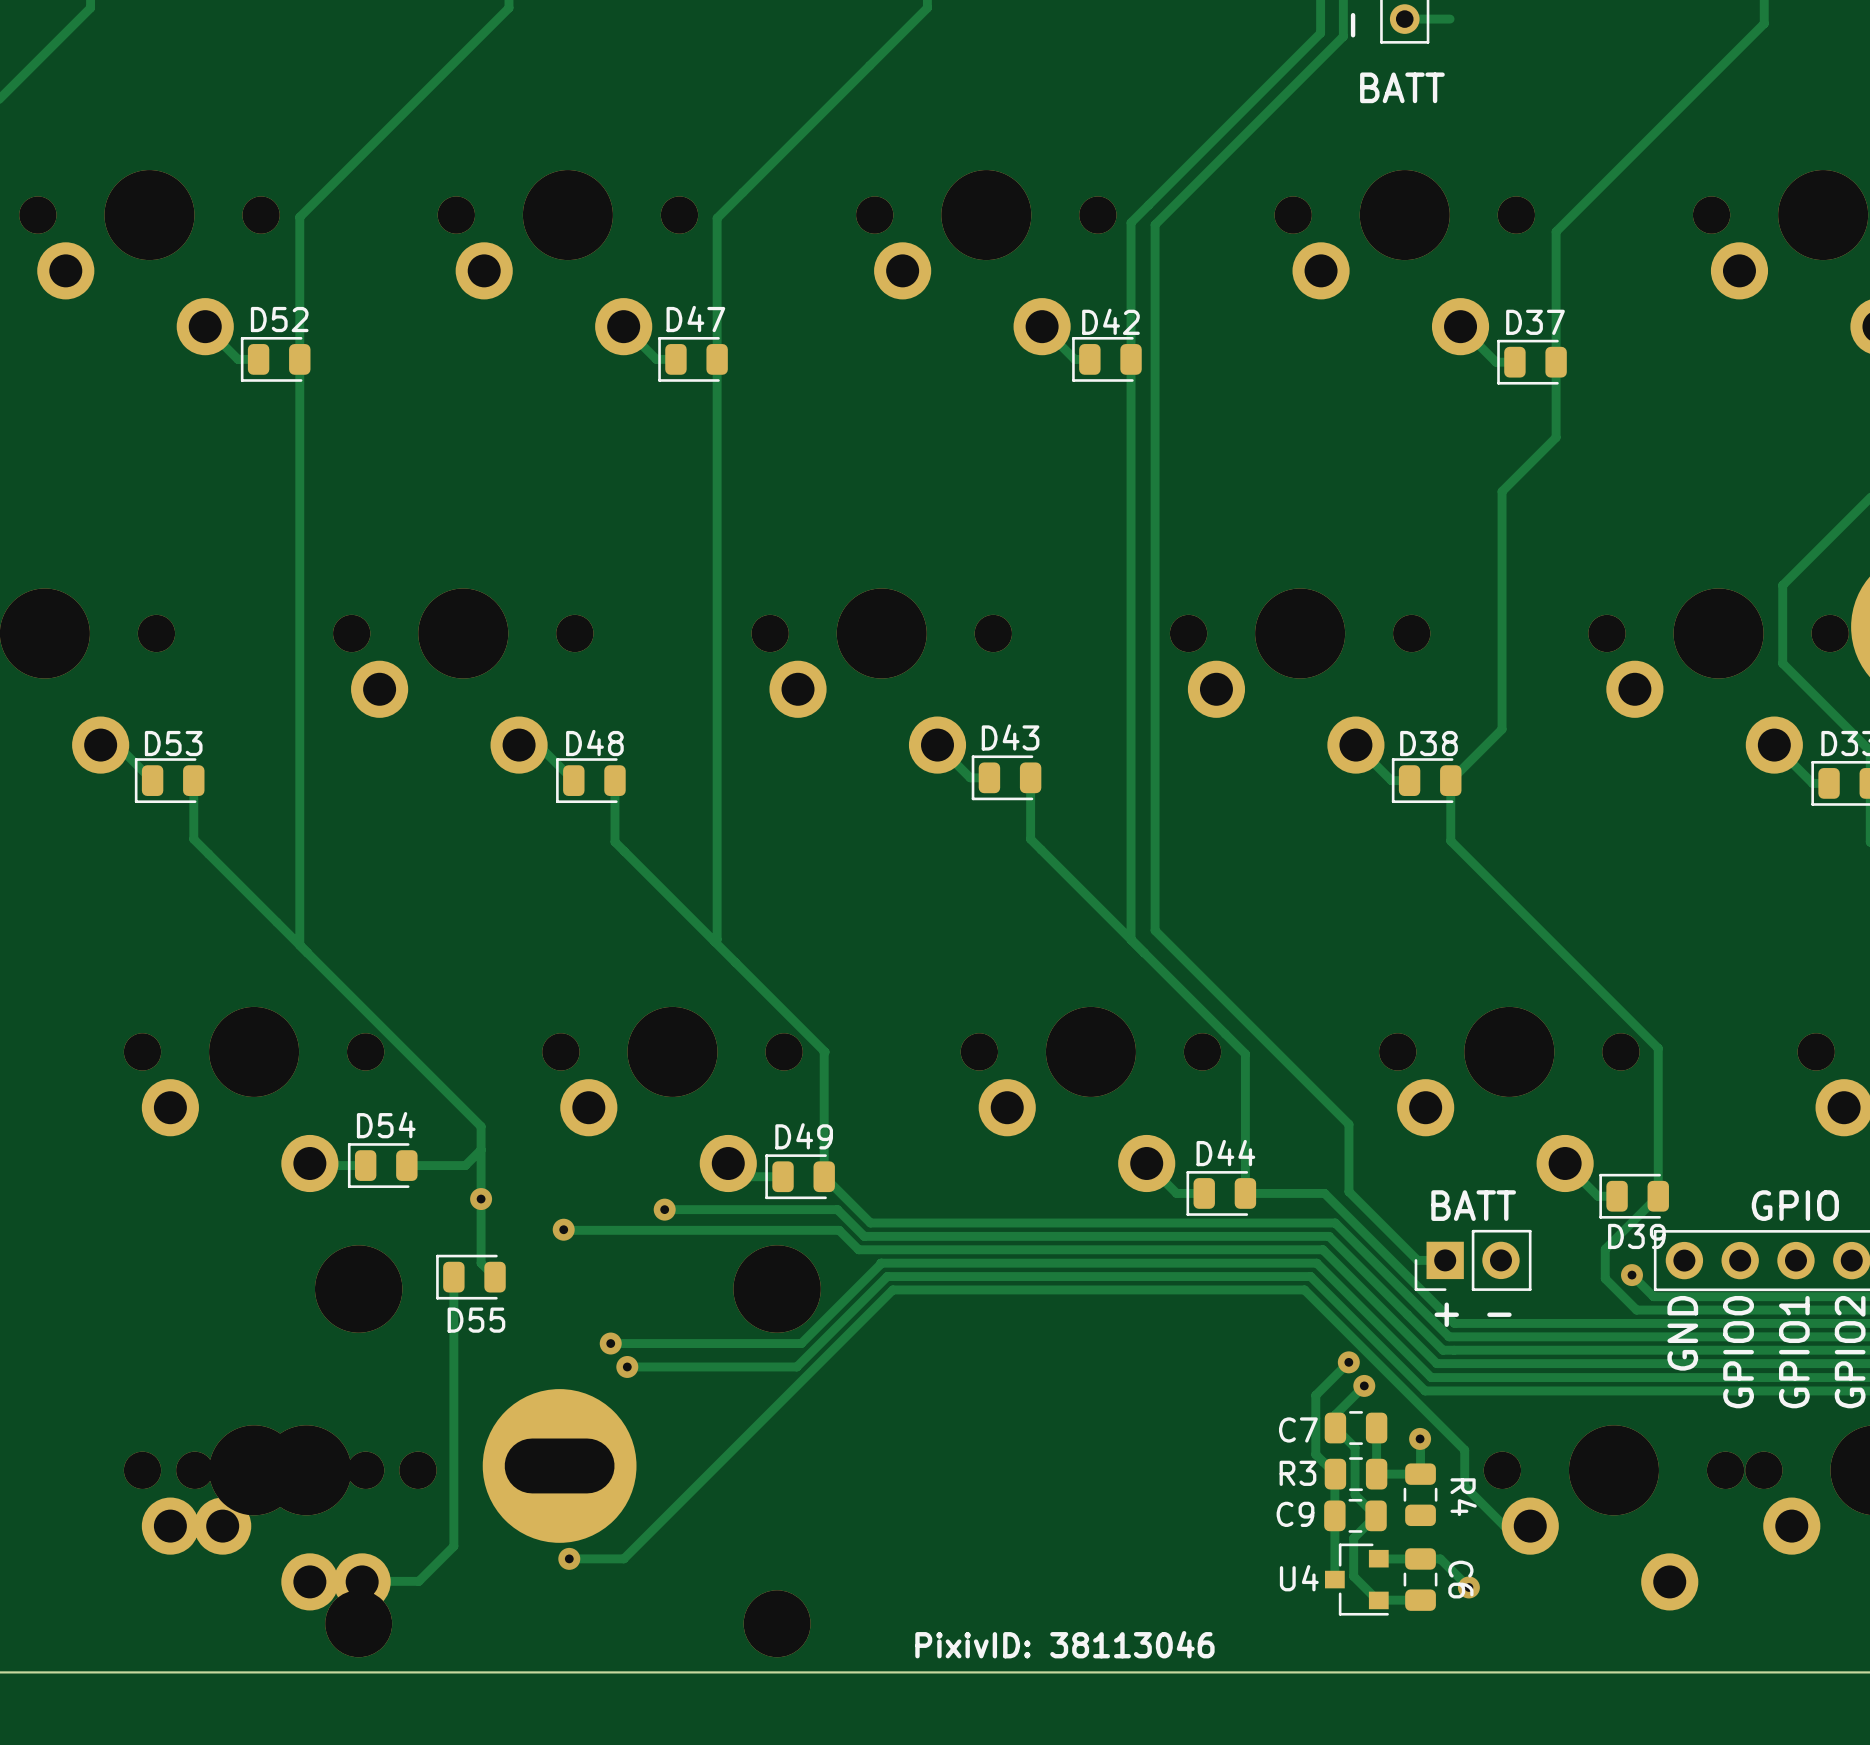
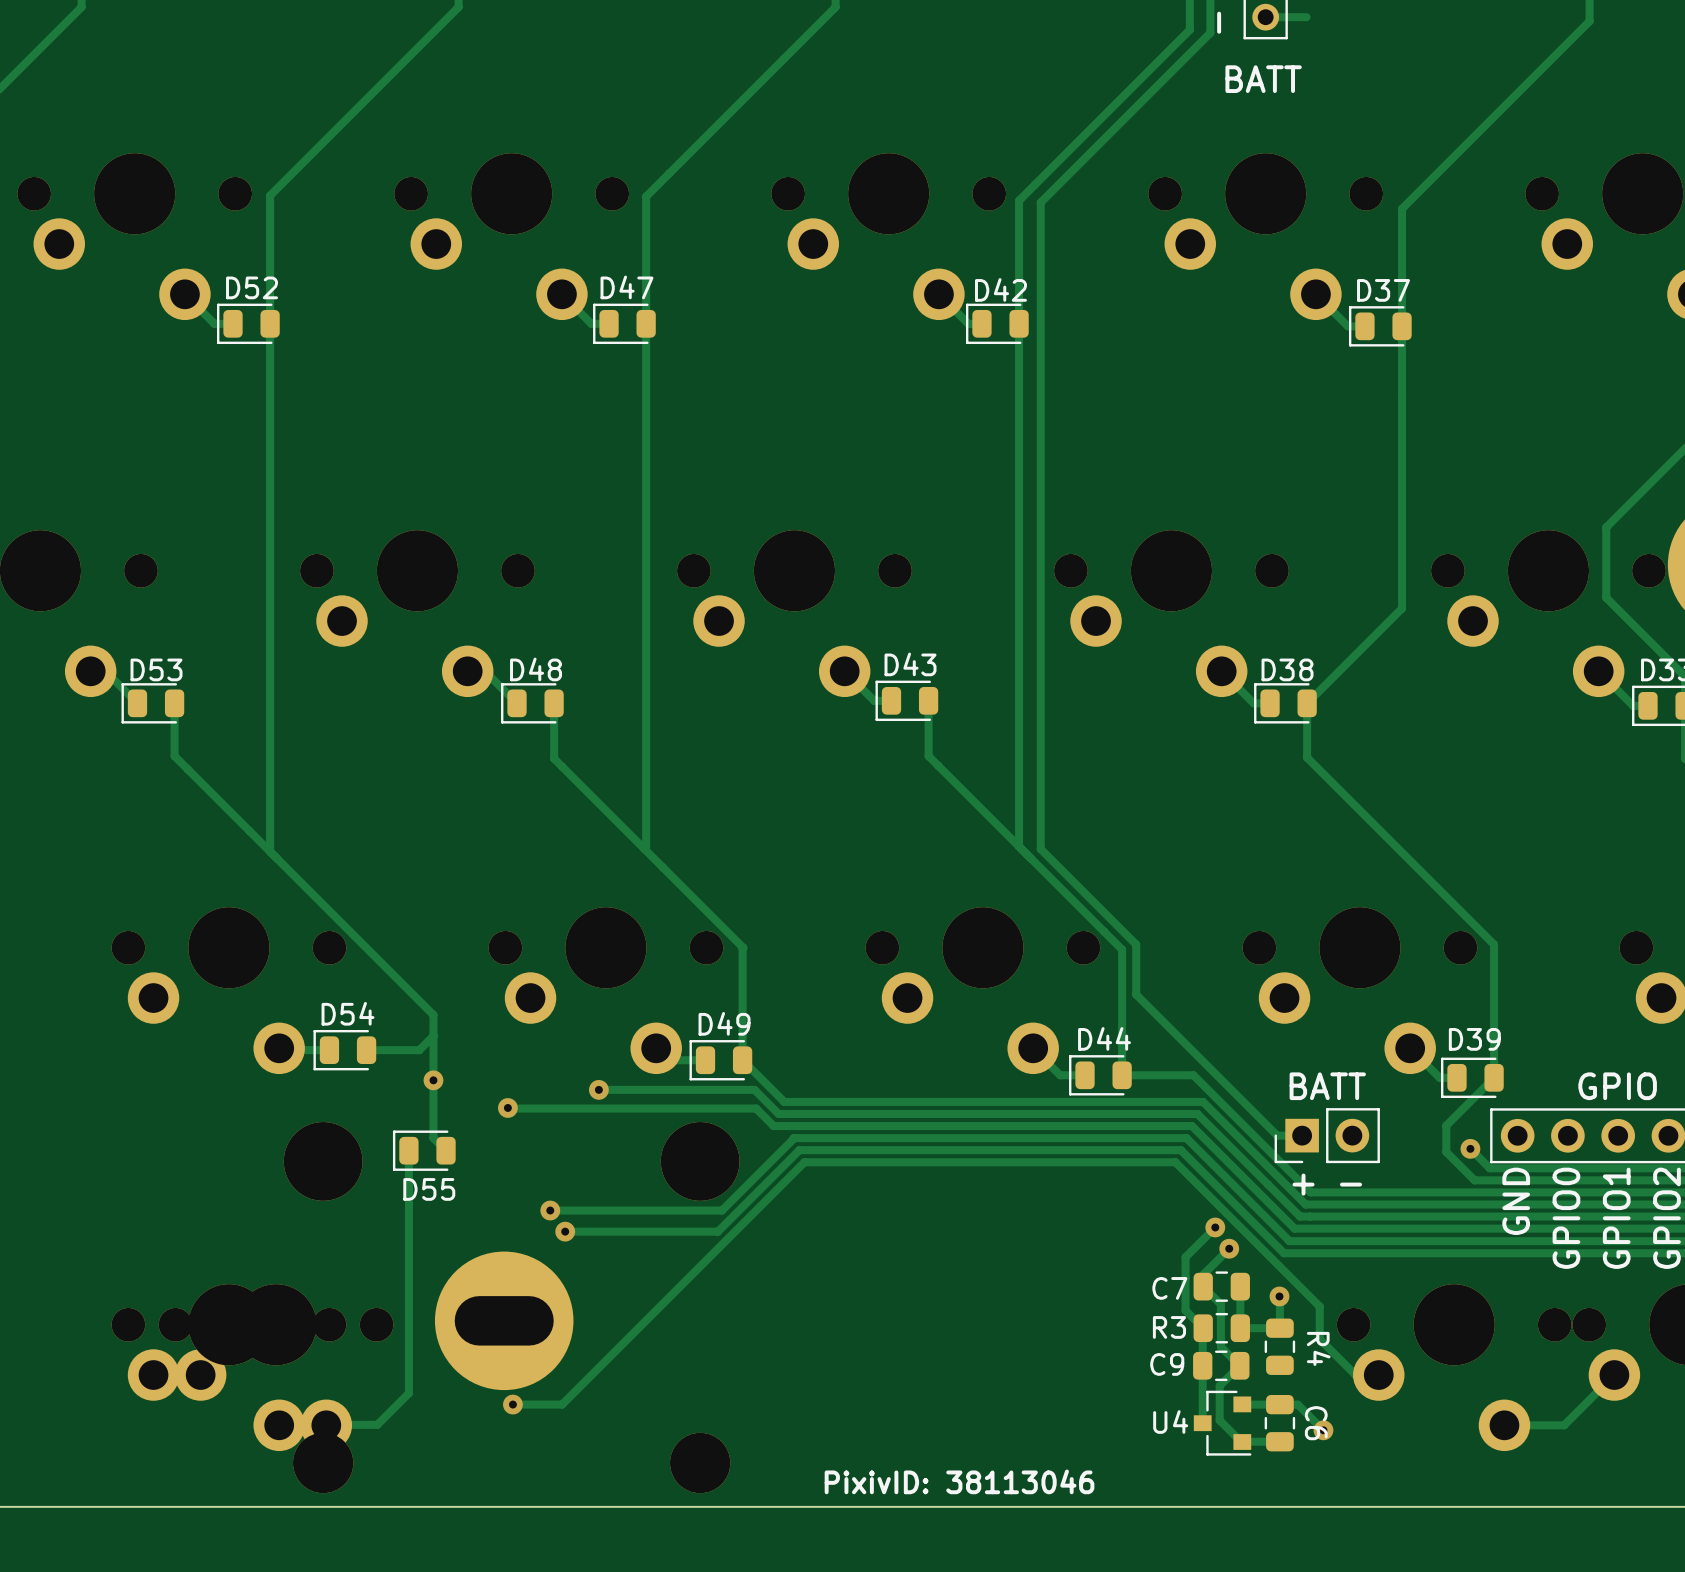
track: (1556, 437) (1502, 491) (1502, 729) -> (1402, 394) (1402, 608) (1353, 657)
track: (1155, 930) (1348, 1124) (1348, 1191) -> (1040, 838) (1040, 849) (1136, 944) (1136, 994) (1215, 1073)
D39 name position: D39 (1636, 1236) -> D39 (1474, 1039)
track: none -> (1614, 1375) (1564, 1425) (1504, 1425)

